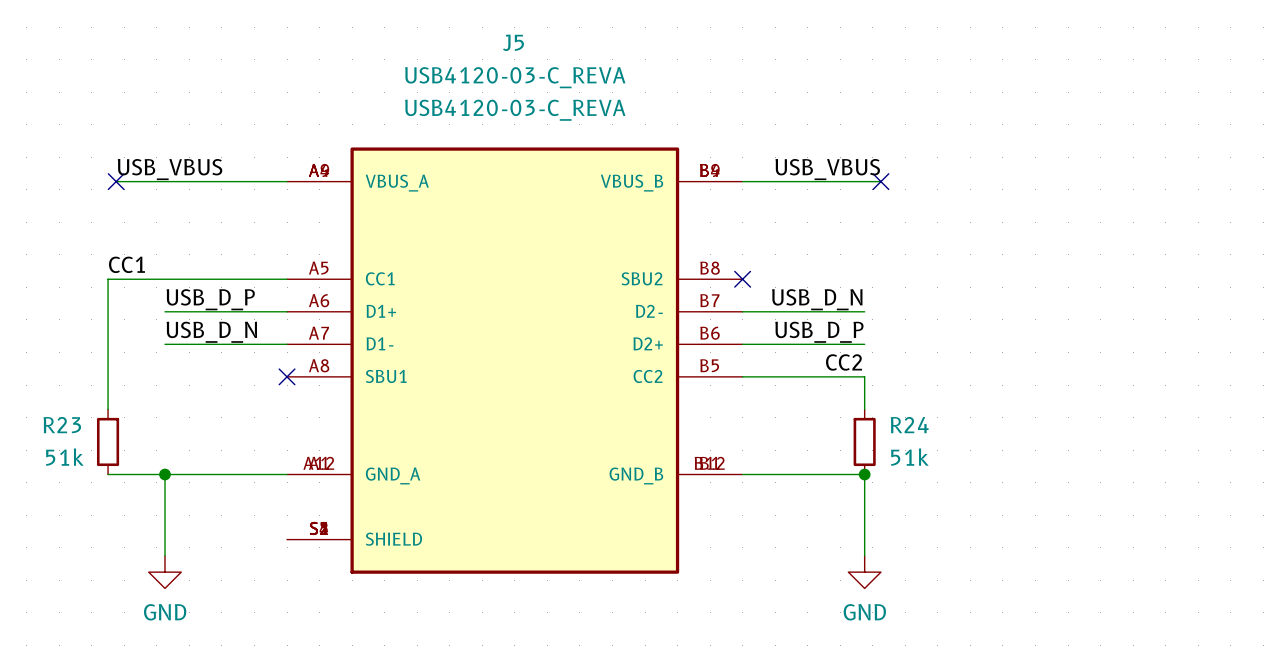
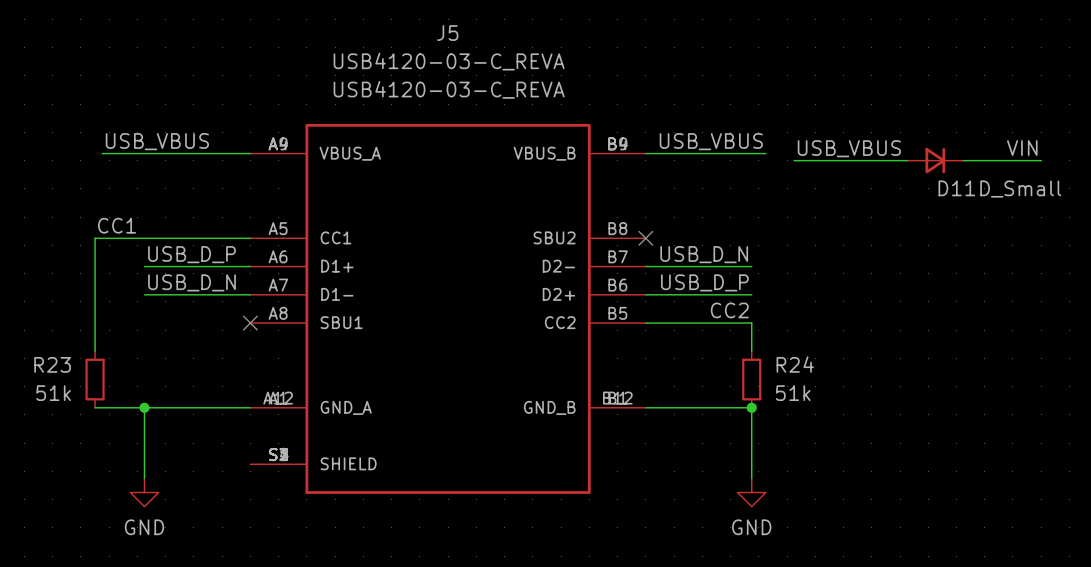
label: none -> VIN (1022, 148)
label: none -> USB_VBUS (849, 148)
no-connect mark: (116, 181) -> none
no-connect mark: (880, 181) -> none
wire: none -> (794, 160) (907, 160)
D11: none -> D_Small (935, 160)
wire: none -> (963, 160) (1041, 160)

